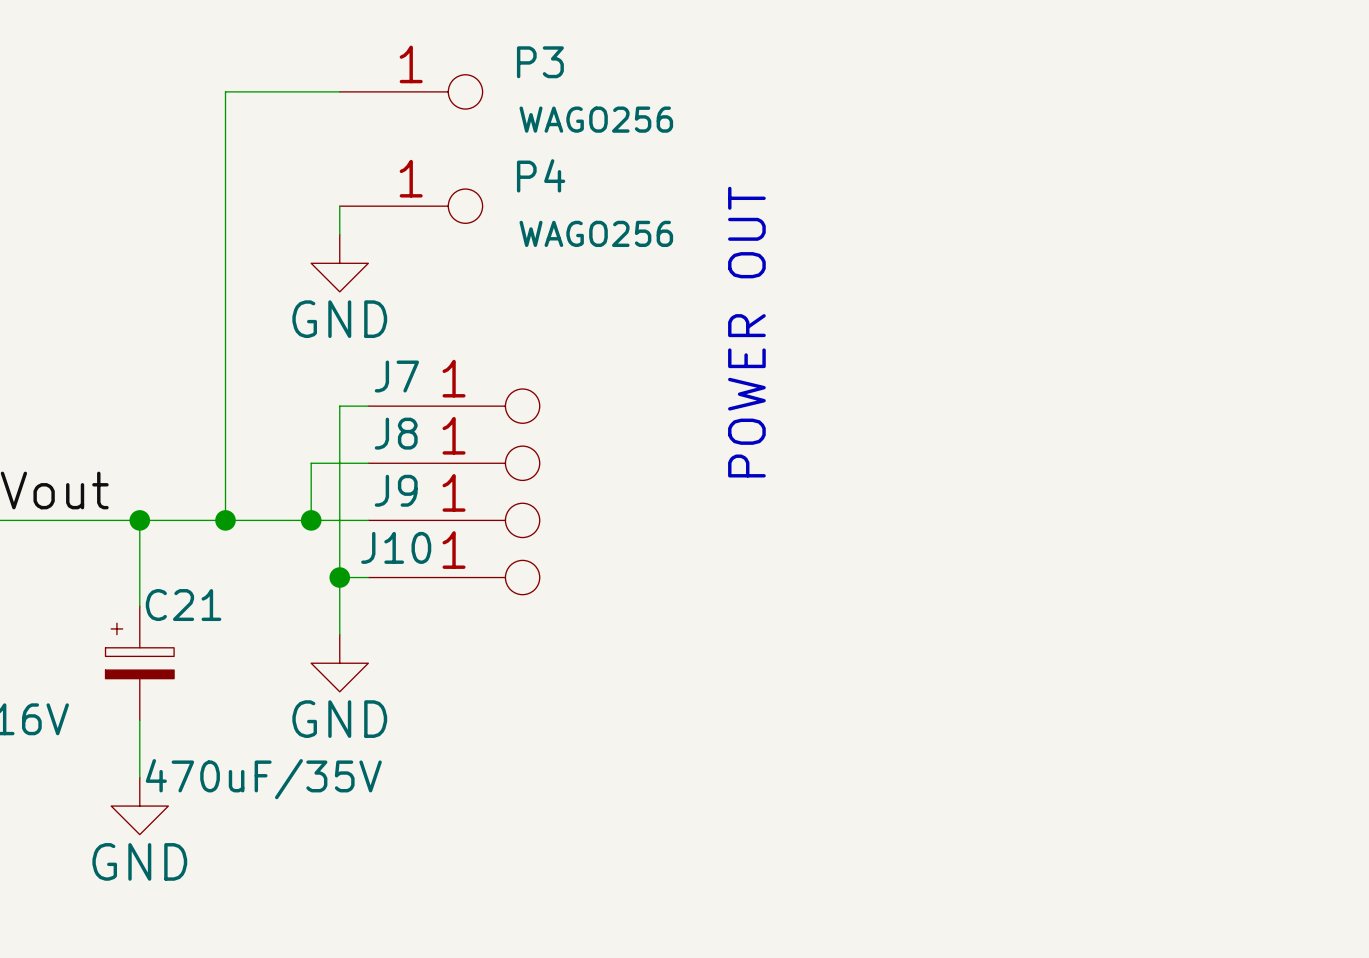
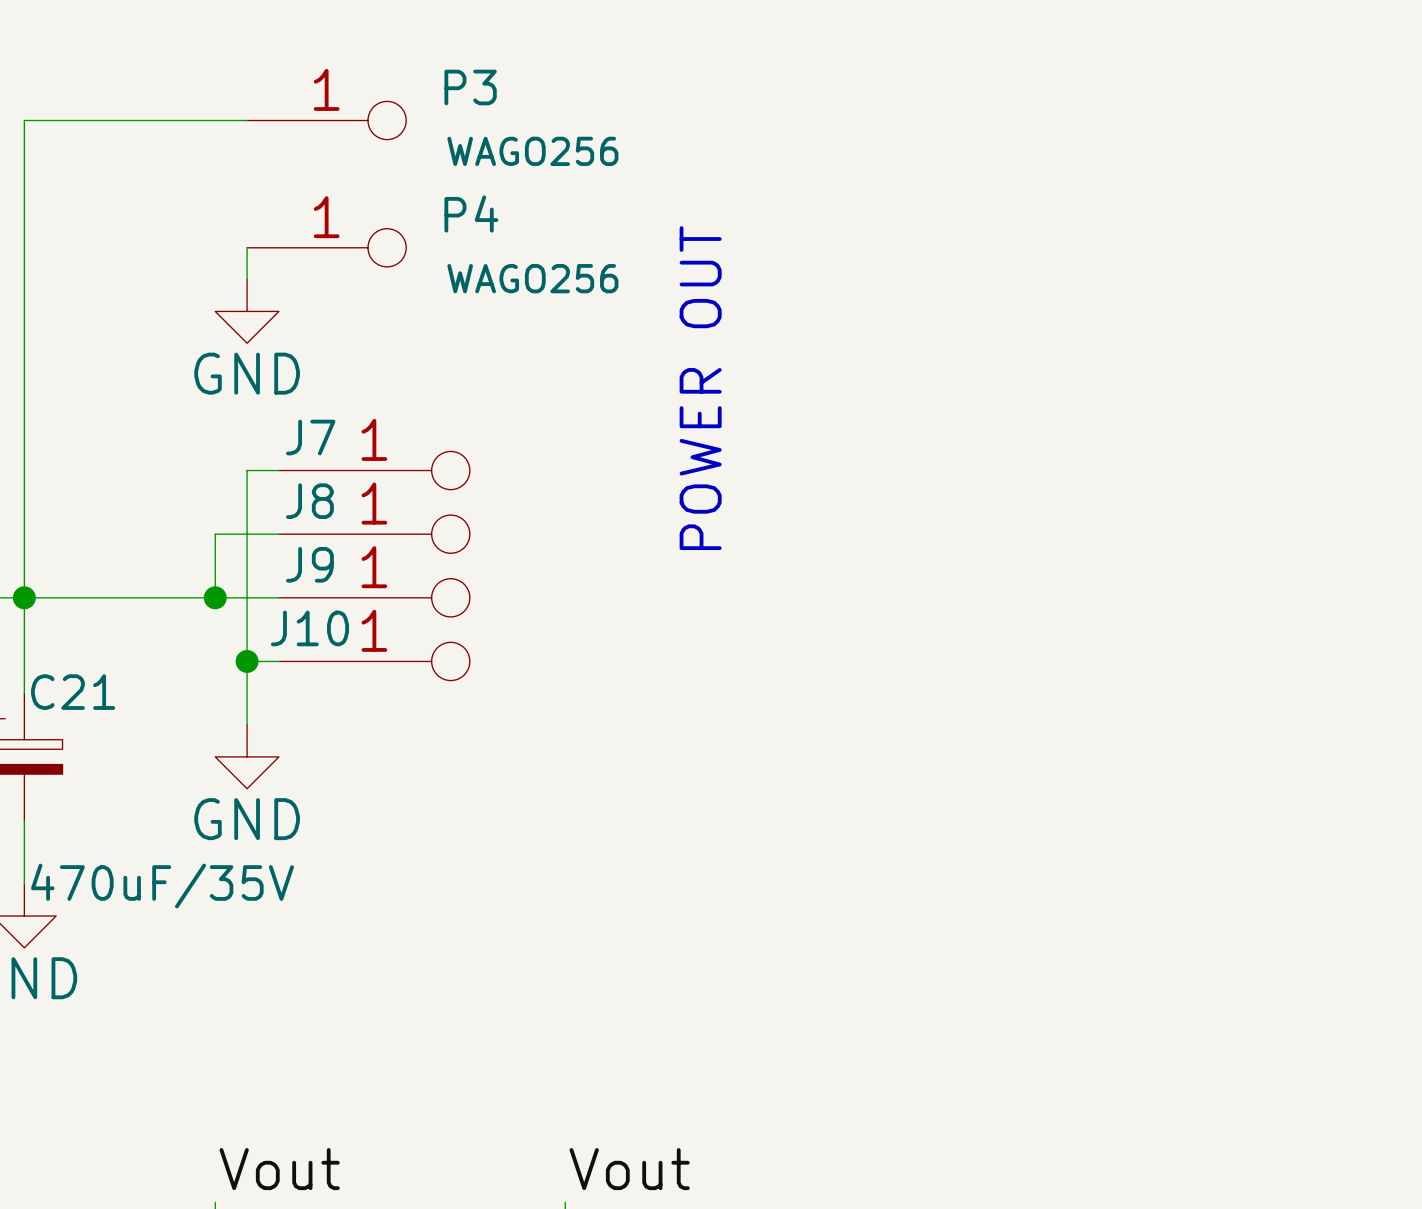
wire: (225, 91) (225, 520) -> (119, 120) (24, 120) (24, 597)
junction: (225, 520) -> none

